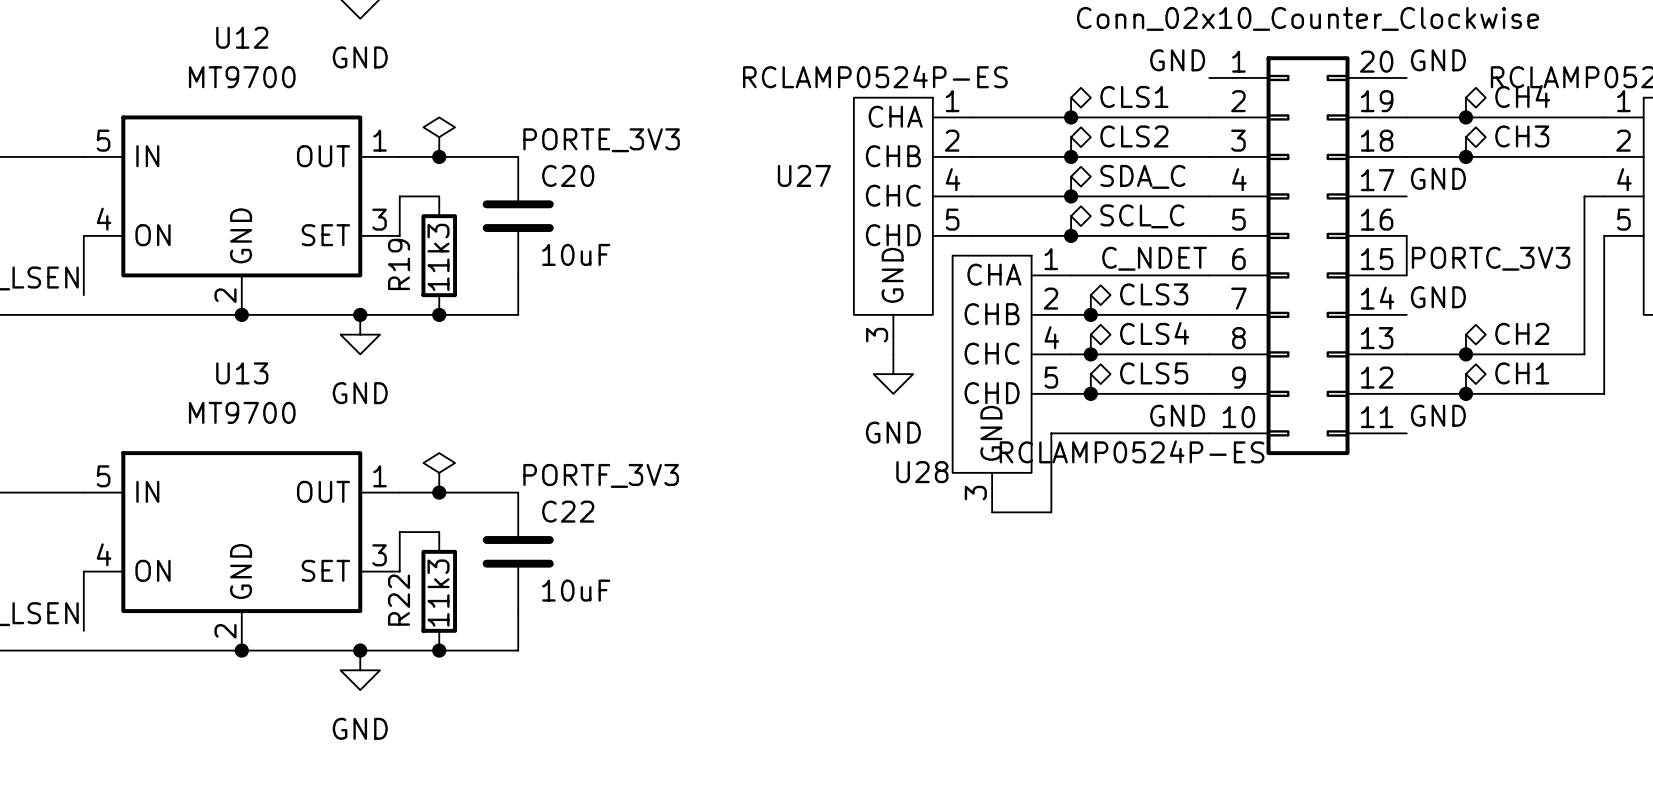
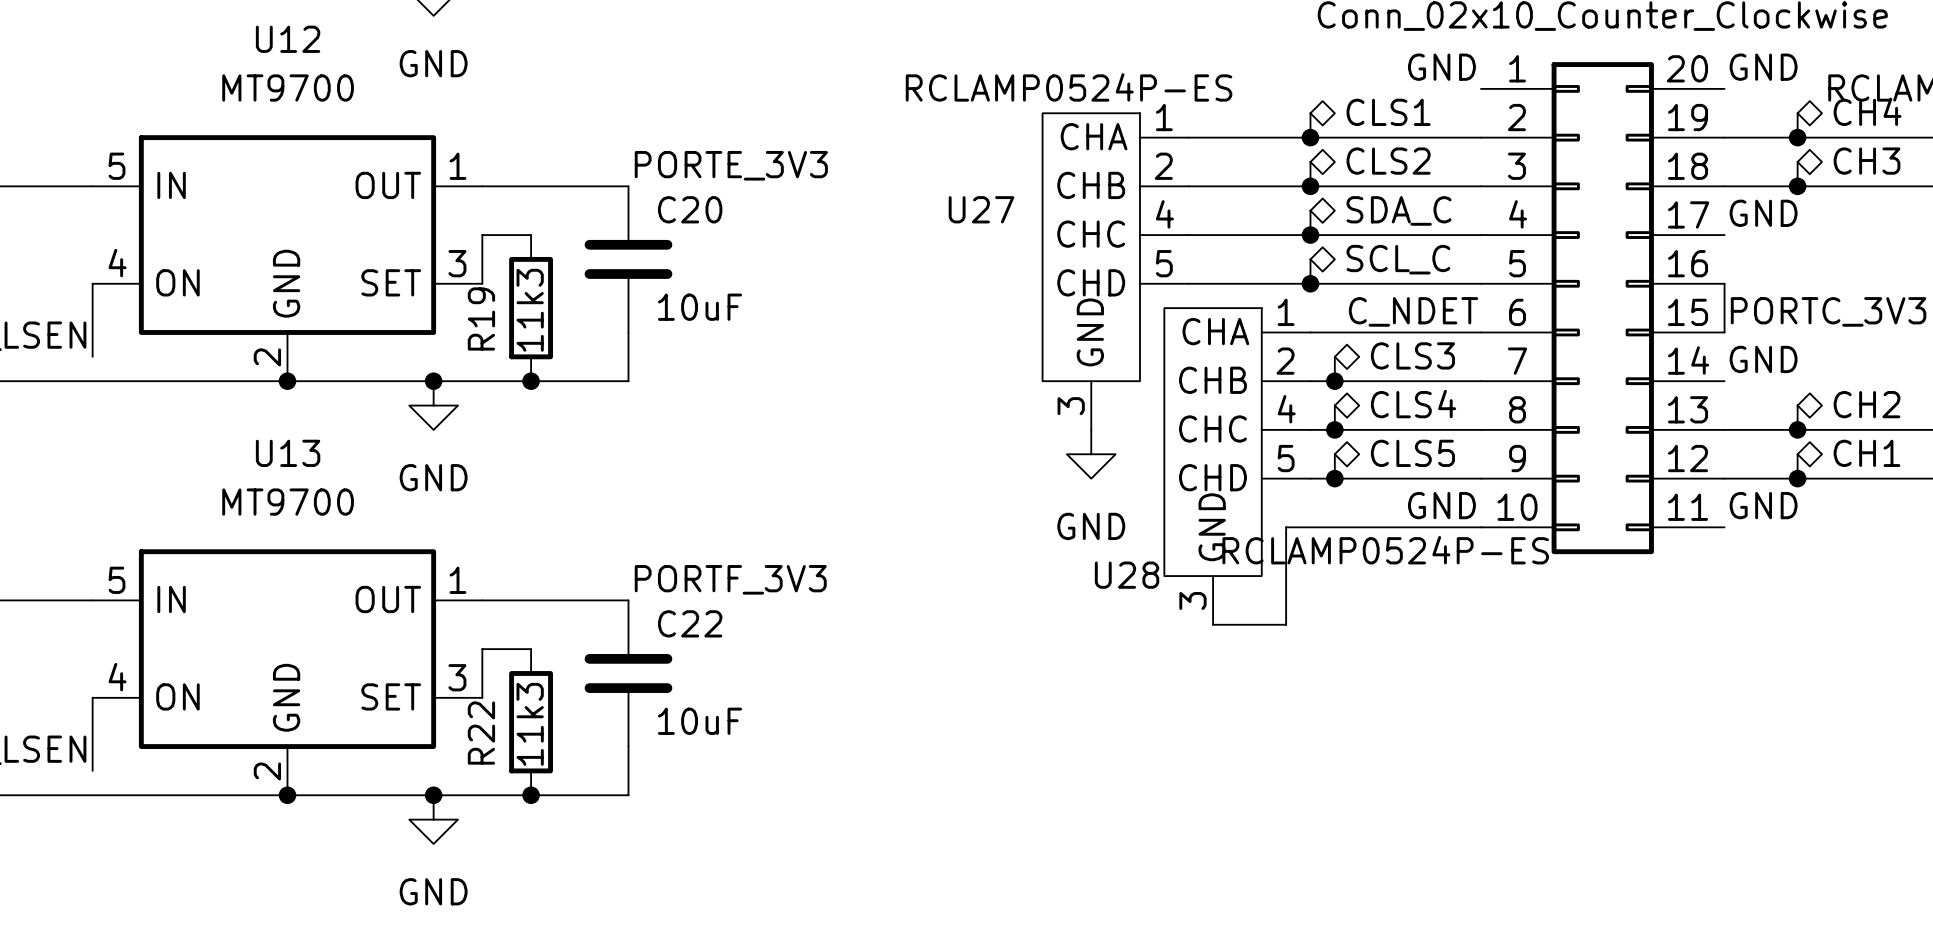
power symbol: (439, 137) -> none
junction: (439, 156) -> none
power symbol: (439, 472) -> none
junction: (439, 492) -> none

